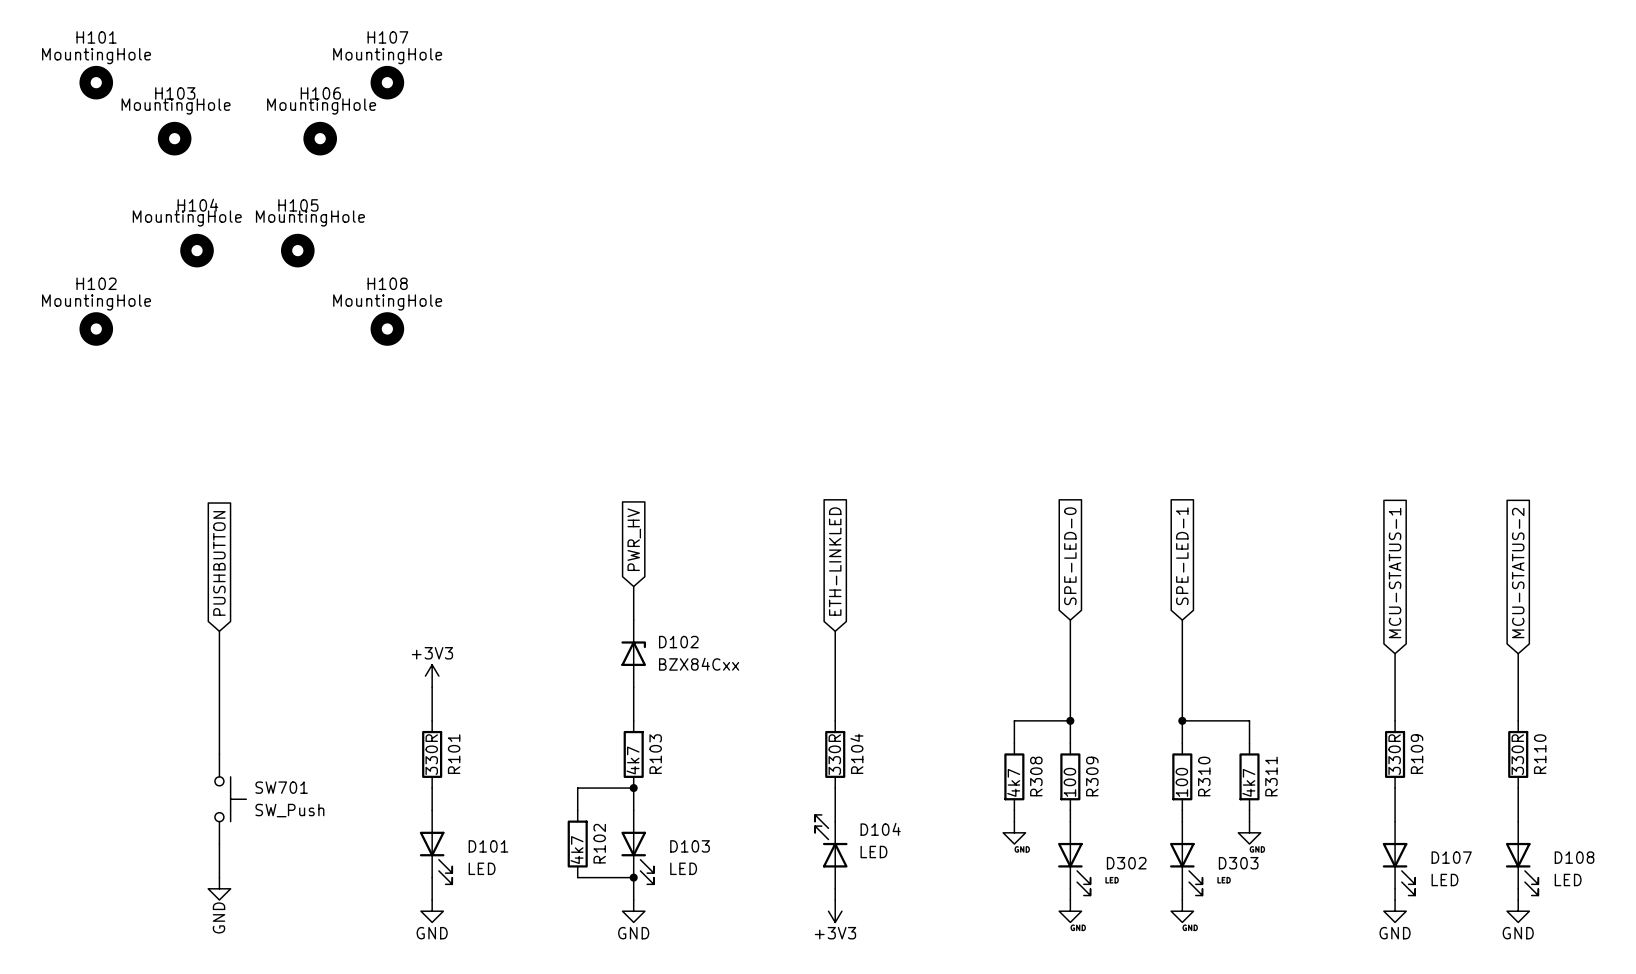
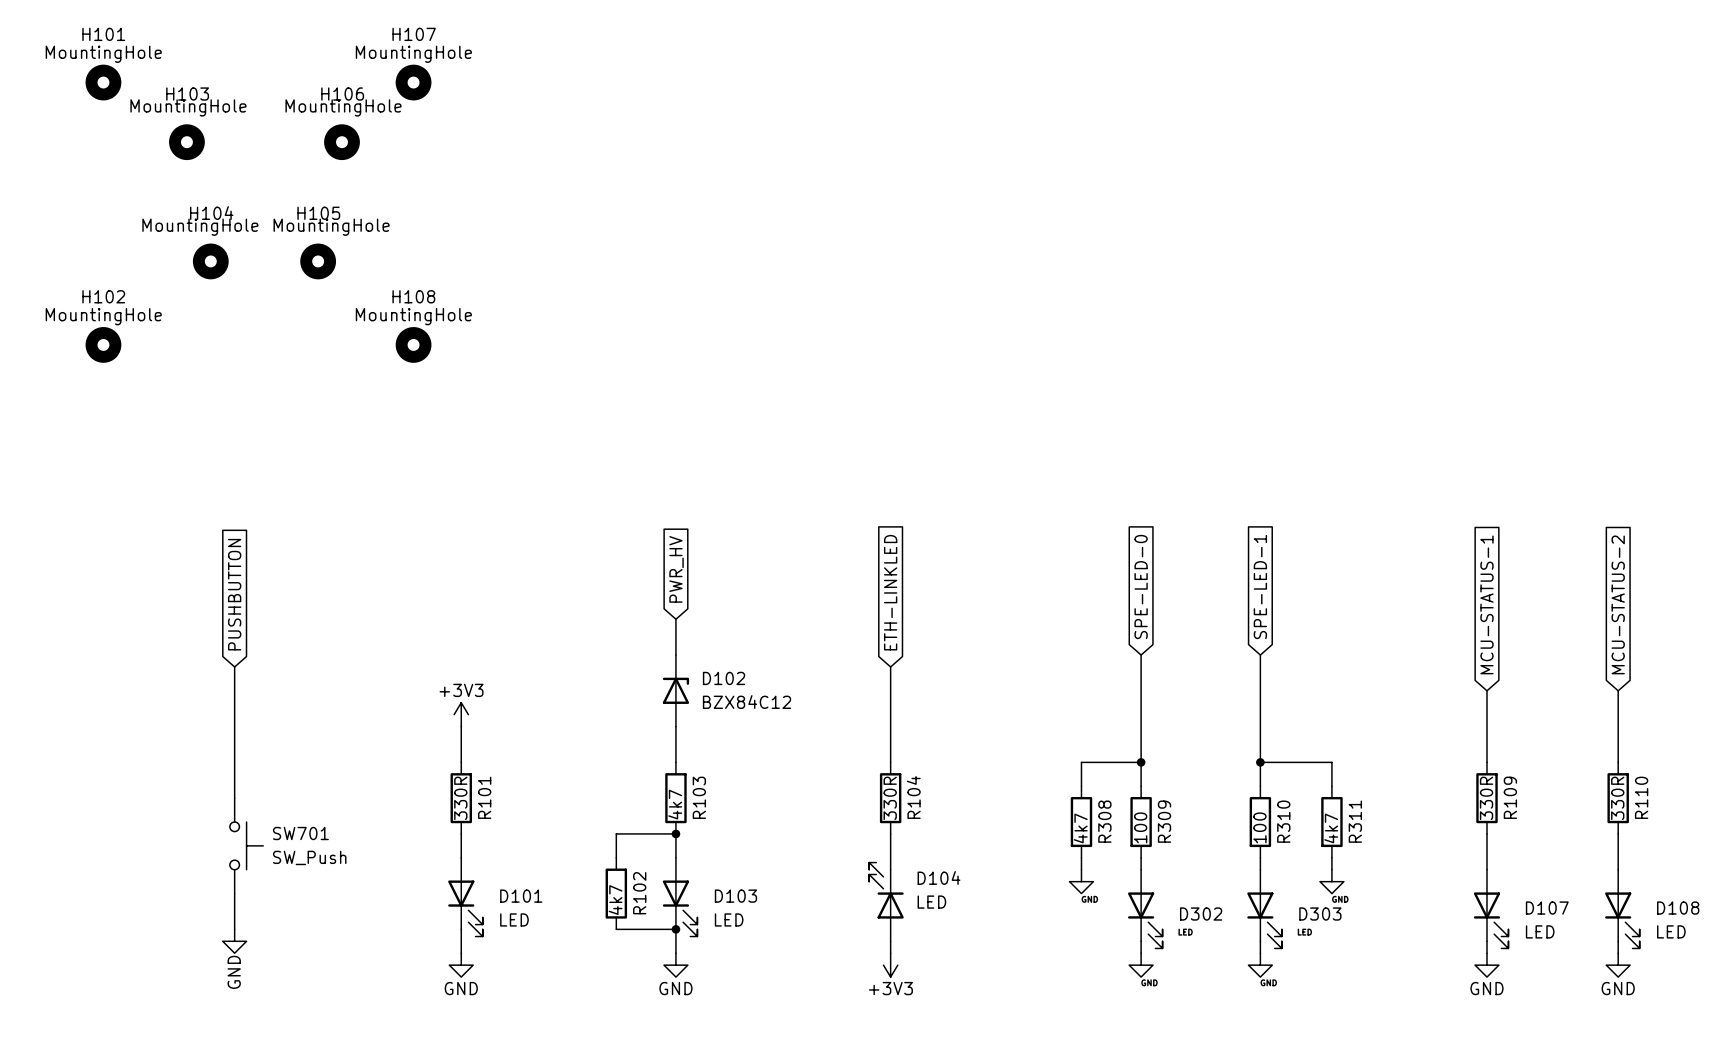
D102 value: BZX84Cxx (699, 664) -> BZX84C12 (747, 702)

